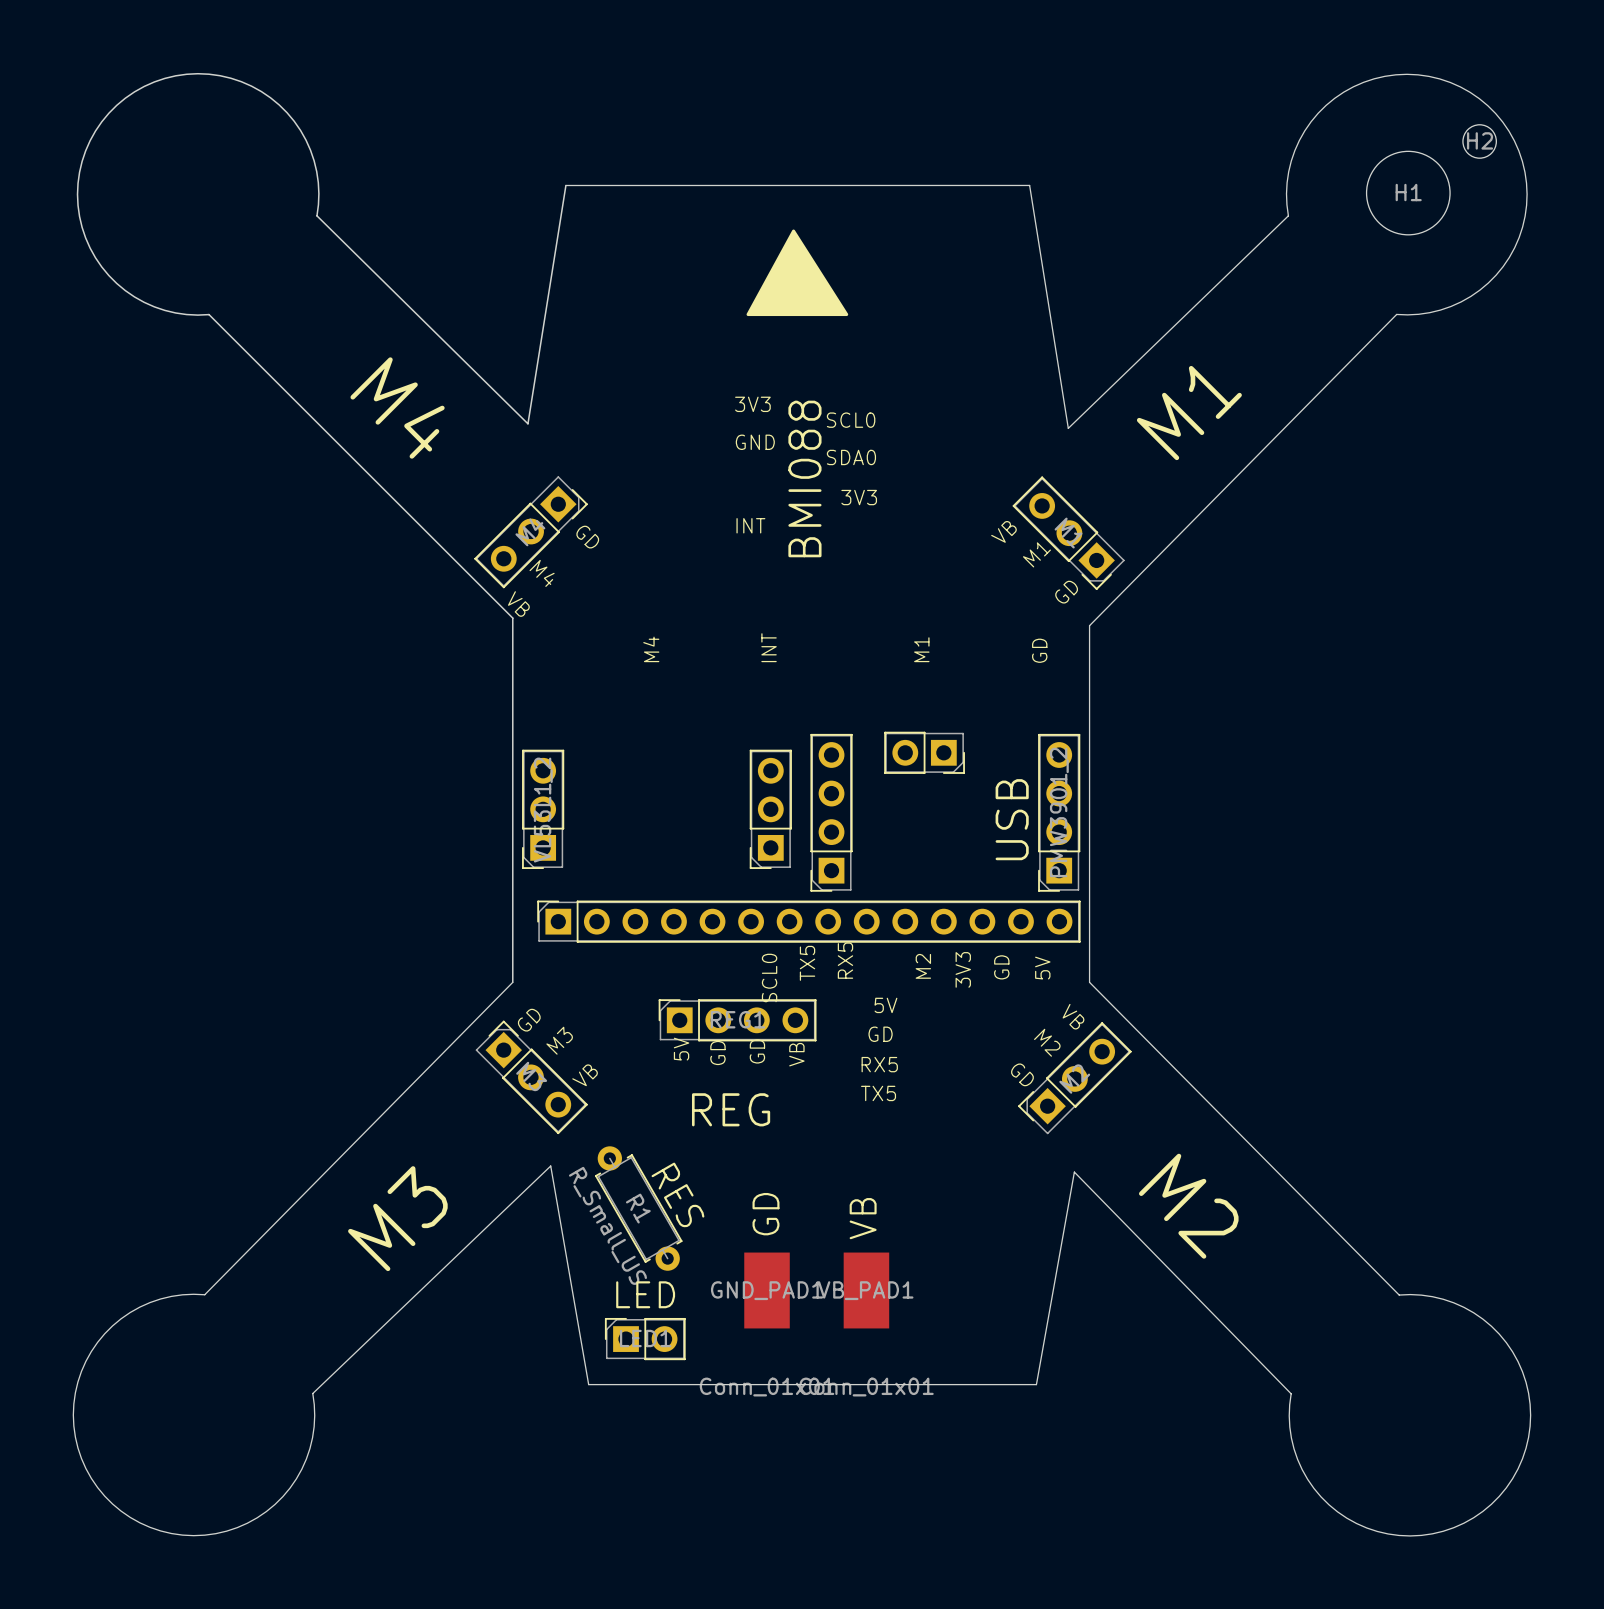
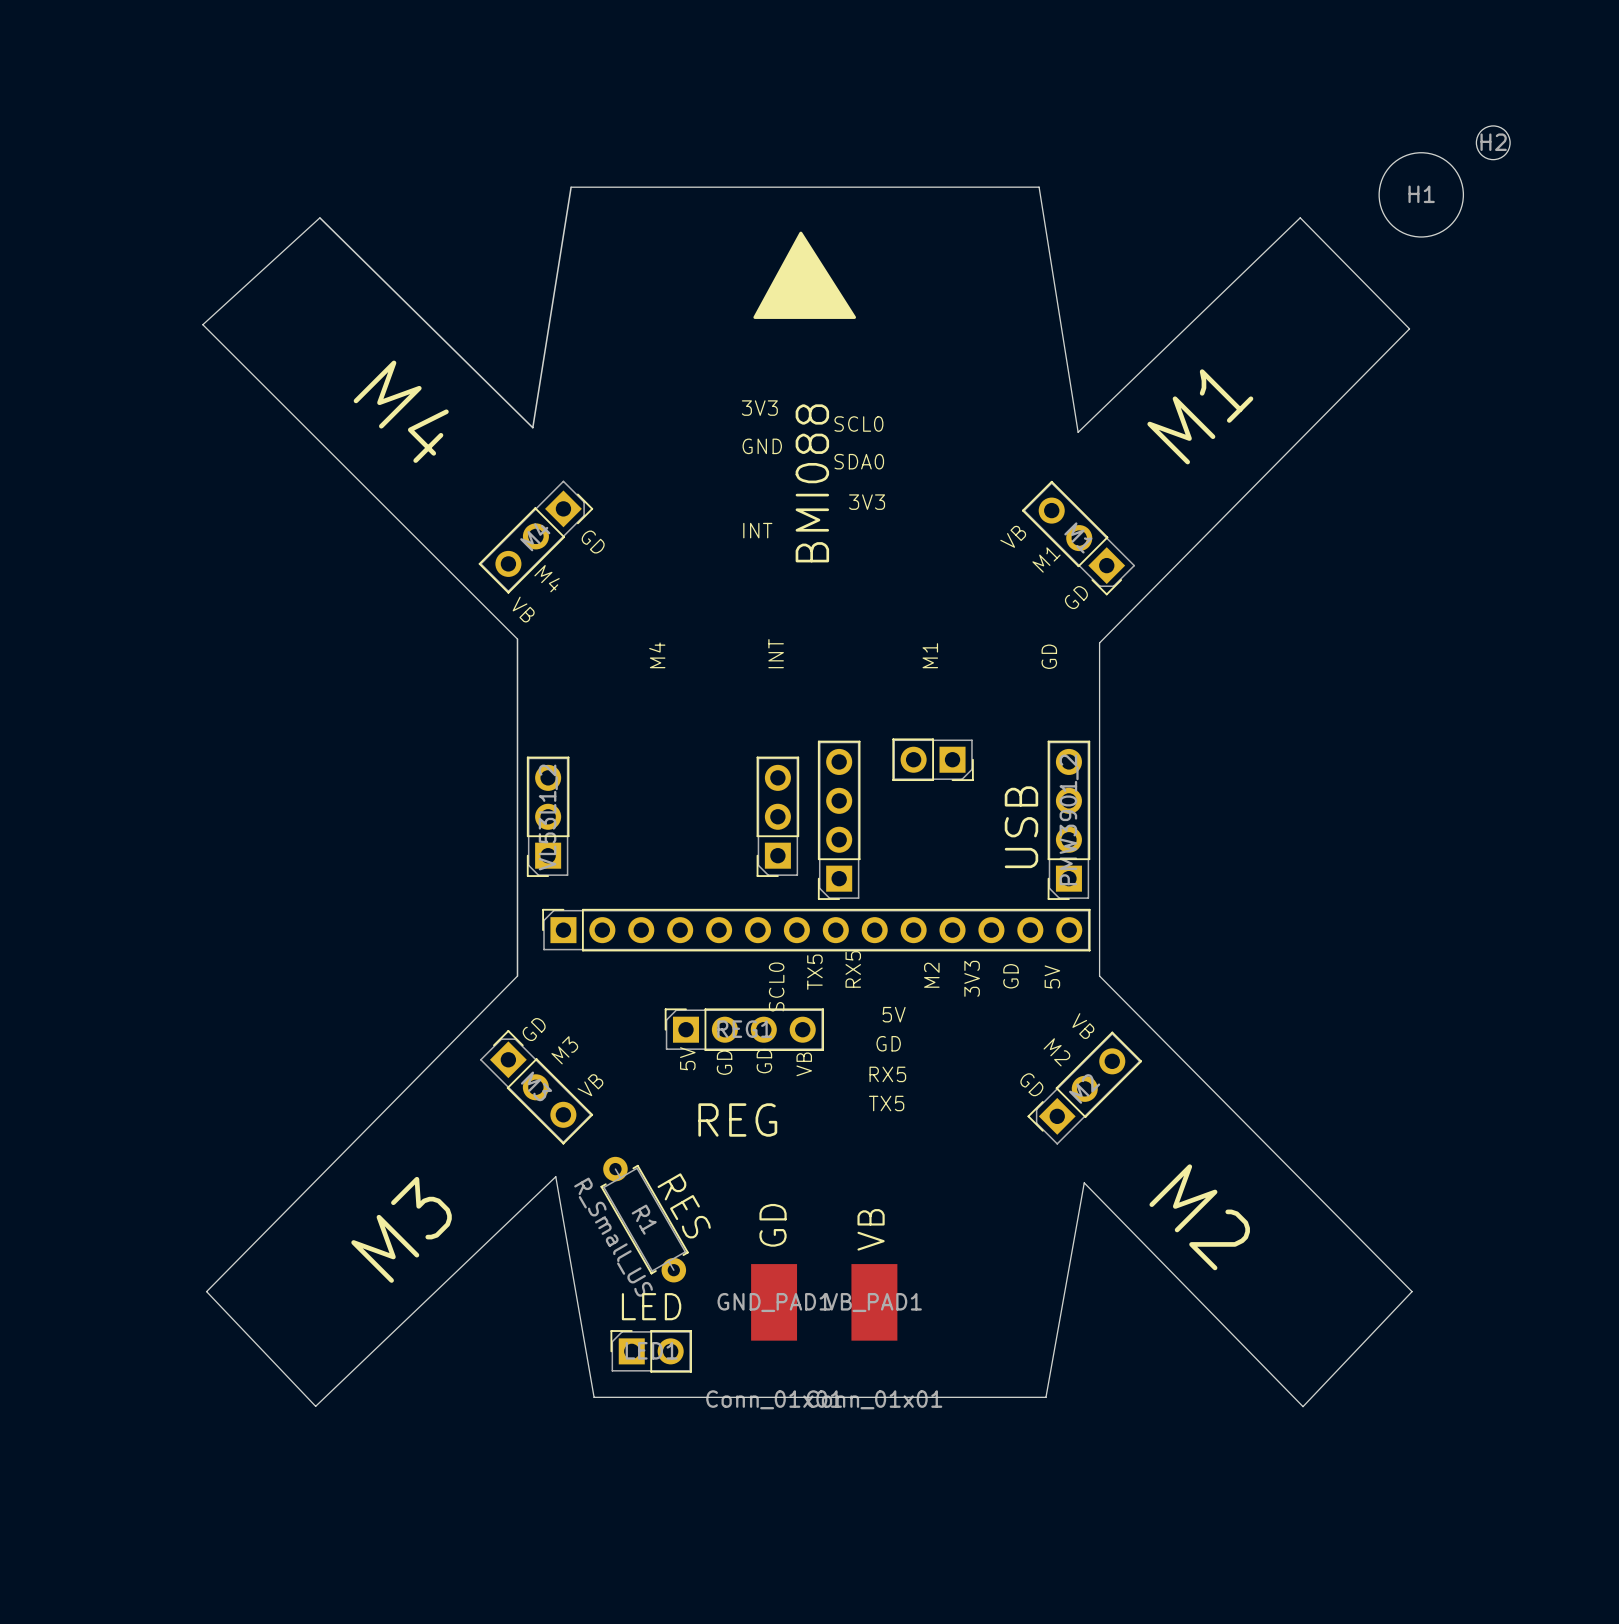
board edge: (316, 215) (318, 182) (310, 150) (300, 130) (287, 112) (261, 91) (230, 78) (208, 74) (186, 74) (164, 78) (144, 86) (116, 105) (95, 130) (85, 150) (79, 172) (78, 205) (85, 237) (101, 267) (116, 283) (134, 296) (154, 306) (175, 312) (208, 314) -> none
board edge: (1288, 215) (1286, 193) (1288, 171) (1299, 140) (1311, 121) (1326, 105) (1343, 92) (1363, 82) (1384, 76) (1407, 74) (1429, 76) (1450, 82) (1470, 92) (1487, 105) (1508, 131) (1518, 150) (1524, 172) (1527, 194) (1522, 227) (1514, 247) (1496, 275) (1479, 290) (1451, 306) (1429, 312) (1396, 314) (1089, 625) (1089, 637) -> (1300, 217) (1409, 328) (1099, 642)
board edge: (208, 314) (512, 618) (512, 633) -> (319, 217) (202, 324) (517, 639)
board edge: (512, 967) (512, 982) (204, 1294) (171, 1296) (150, 1302) (130, 1312) (104, 1333) (91, 1351) (77, 1382) (73, 1414) (75, 1437) (81, 1458) (91, 1478) (104, 1496) (121, 1511) (140, 1522) (171, 1533) (193, 1535) (215, 1533) (237, 1527) (257, 1517) (274, 1504) (296, 1478) (306, 1459) (312, 1437) (314, 1415) (312, 1393) -> (517, 976) (206, 1291) (315, 1406)
board edge: (1089, 967) (1089, 982) (1399, 1295) (1432, 1296) (1453, 1302) (1473, 1312) (1499, 1334) (1518, 1361) (1526, 1382) (1530, 1404) (1528, 1437) (1522, 1458) (1512, 1478) (1499, 1496) (1473, 1517) (1453, 1527) (1432, 1533) (1410, 1535) (1388, 1533) (1356, 1523) (1337, 1511) (1321, 1496) (1307, 1479) (1297, 1459) (1291, 1438) (1289, 1415) (1291, 1393) -> (1099, 976) (1412, 1291) (1303, 1406)

